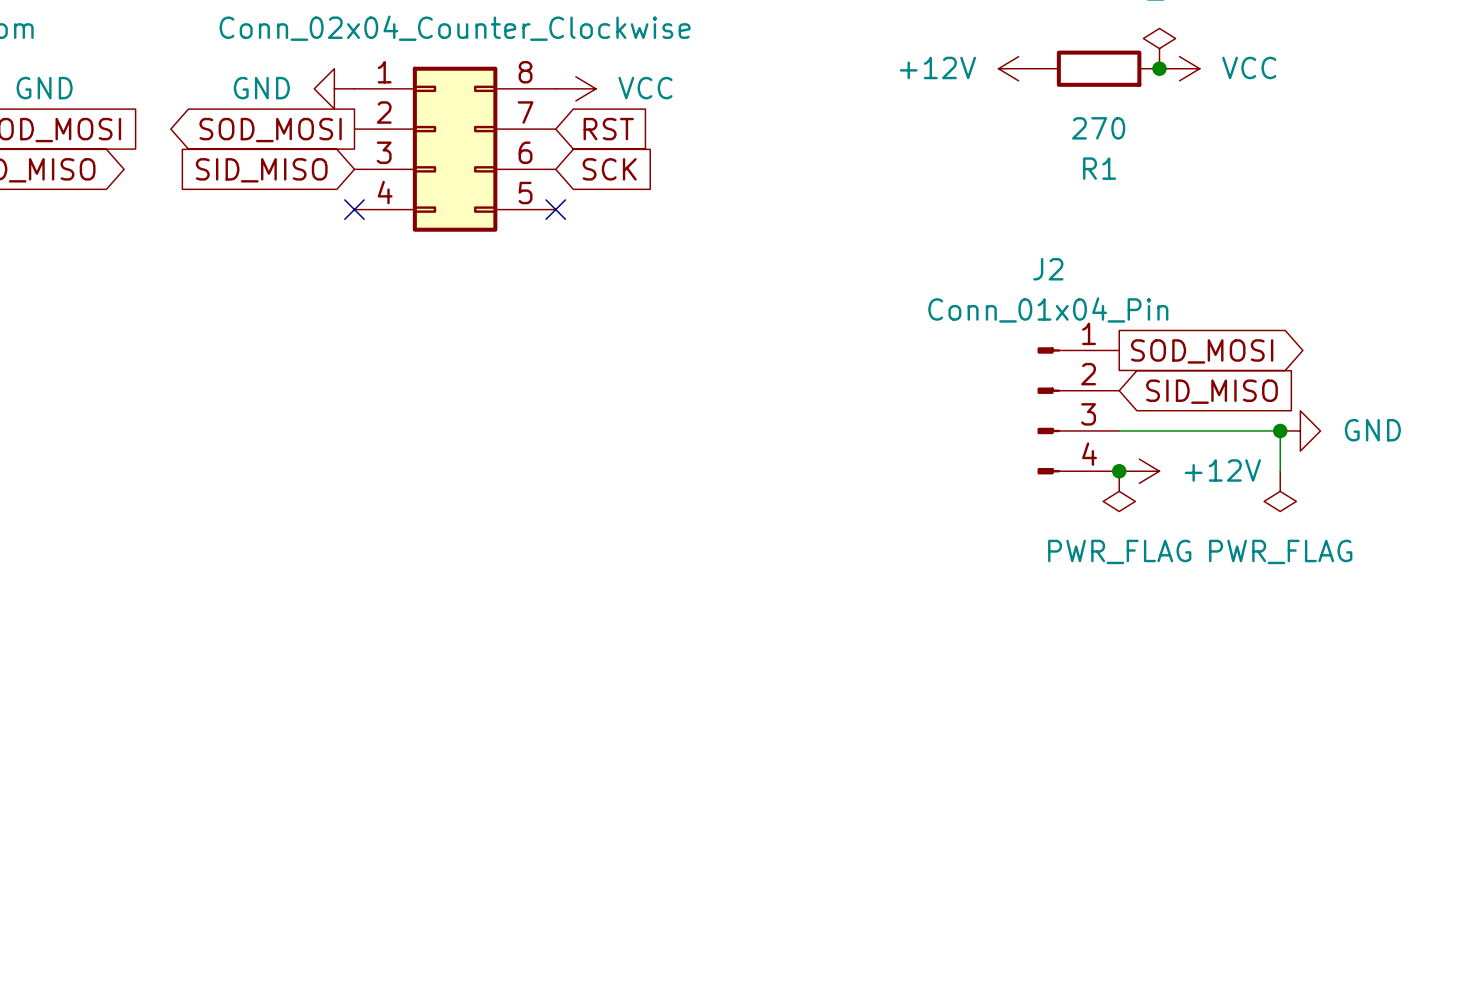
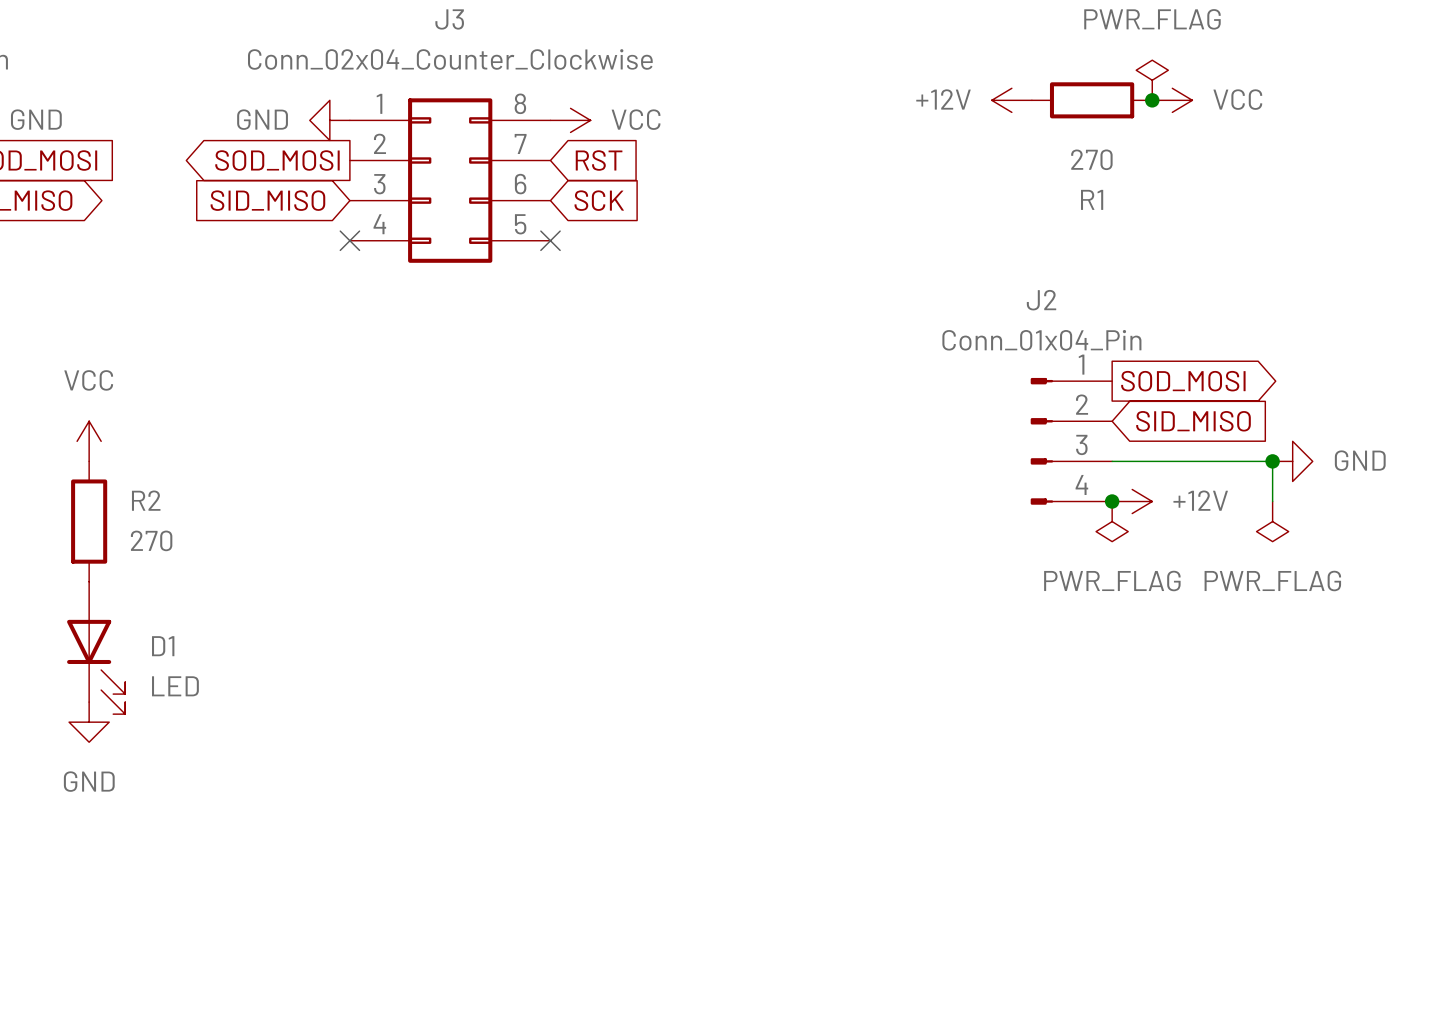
power symbol: none -> VCC (89, 441)
R2: none -> 270 (89, 521)
D1: none -> LED (96, 647)
power symbol: none -> GND (89, 722)

